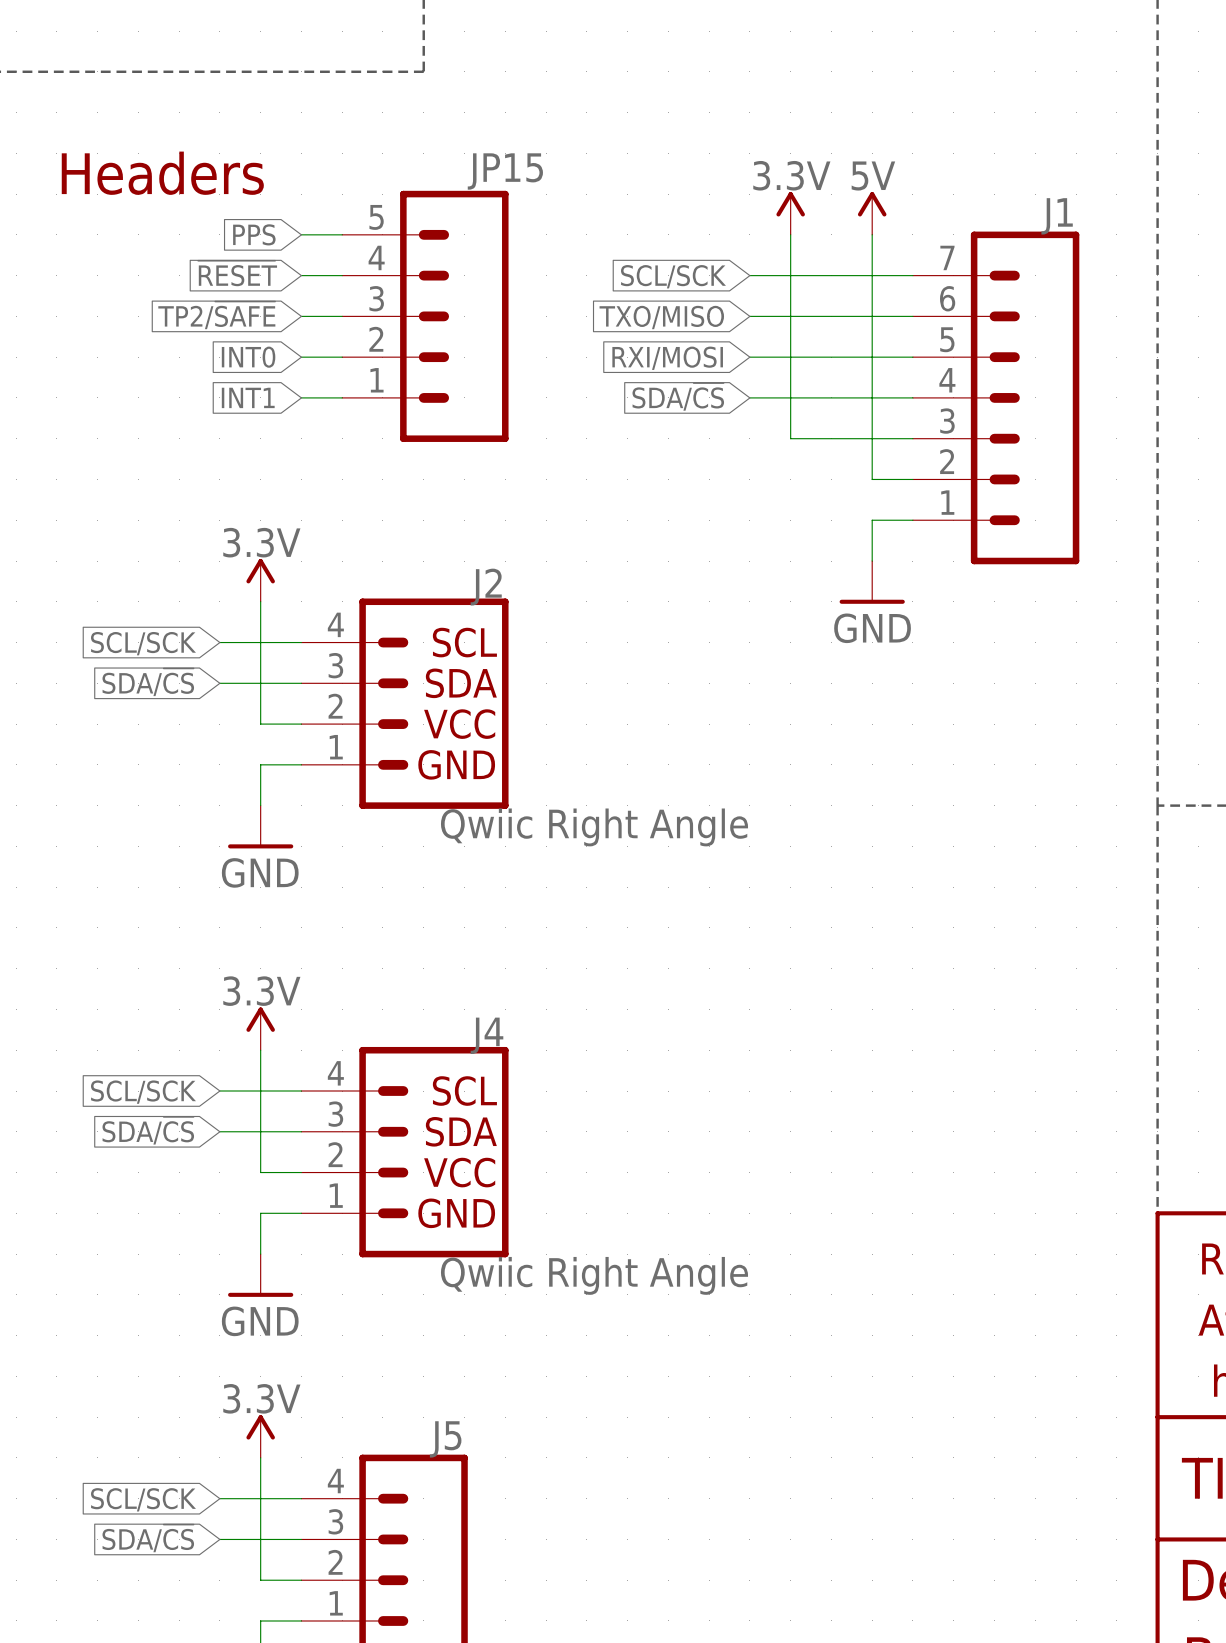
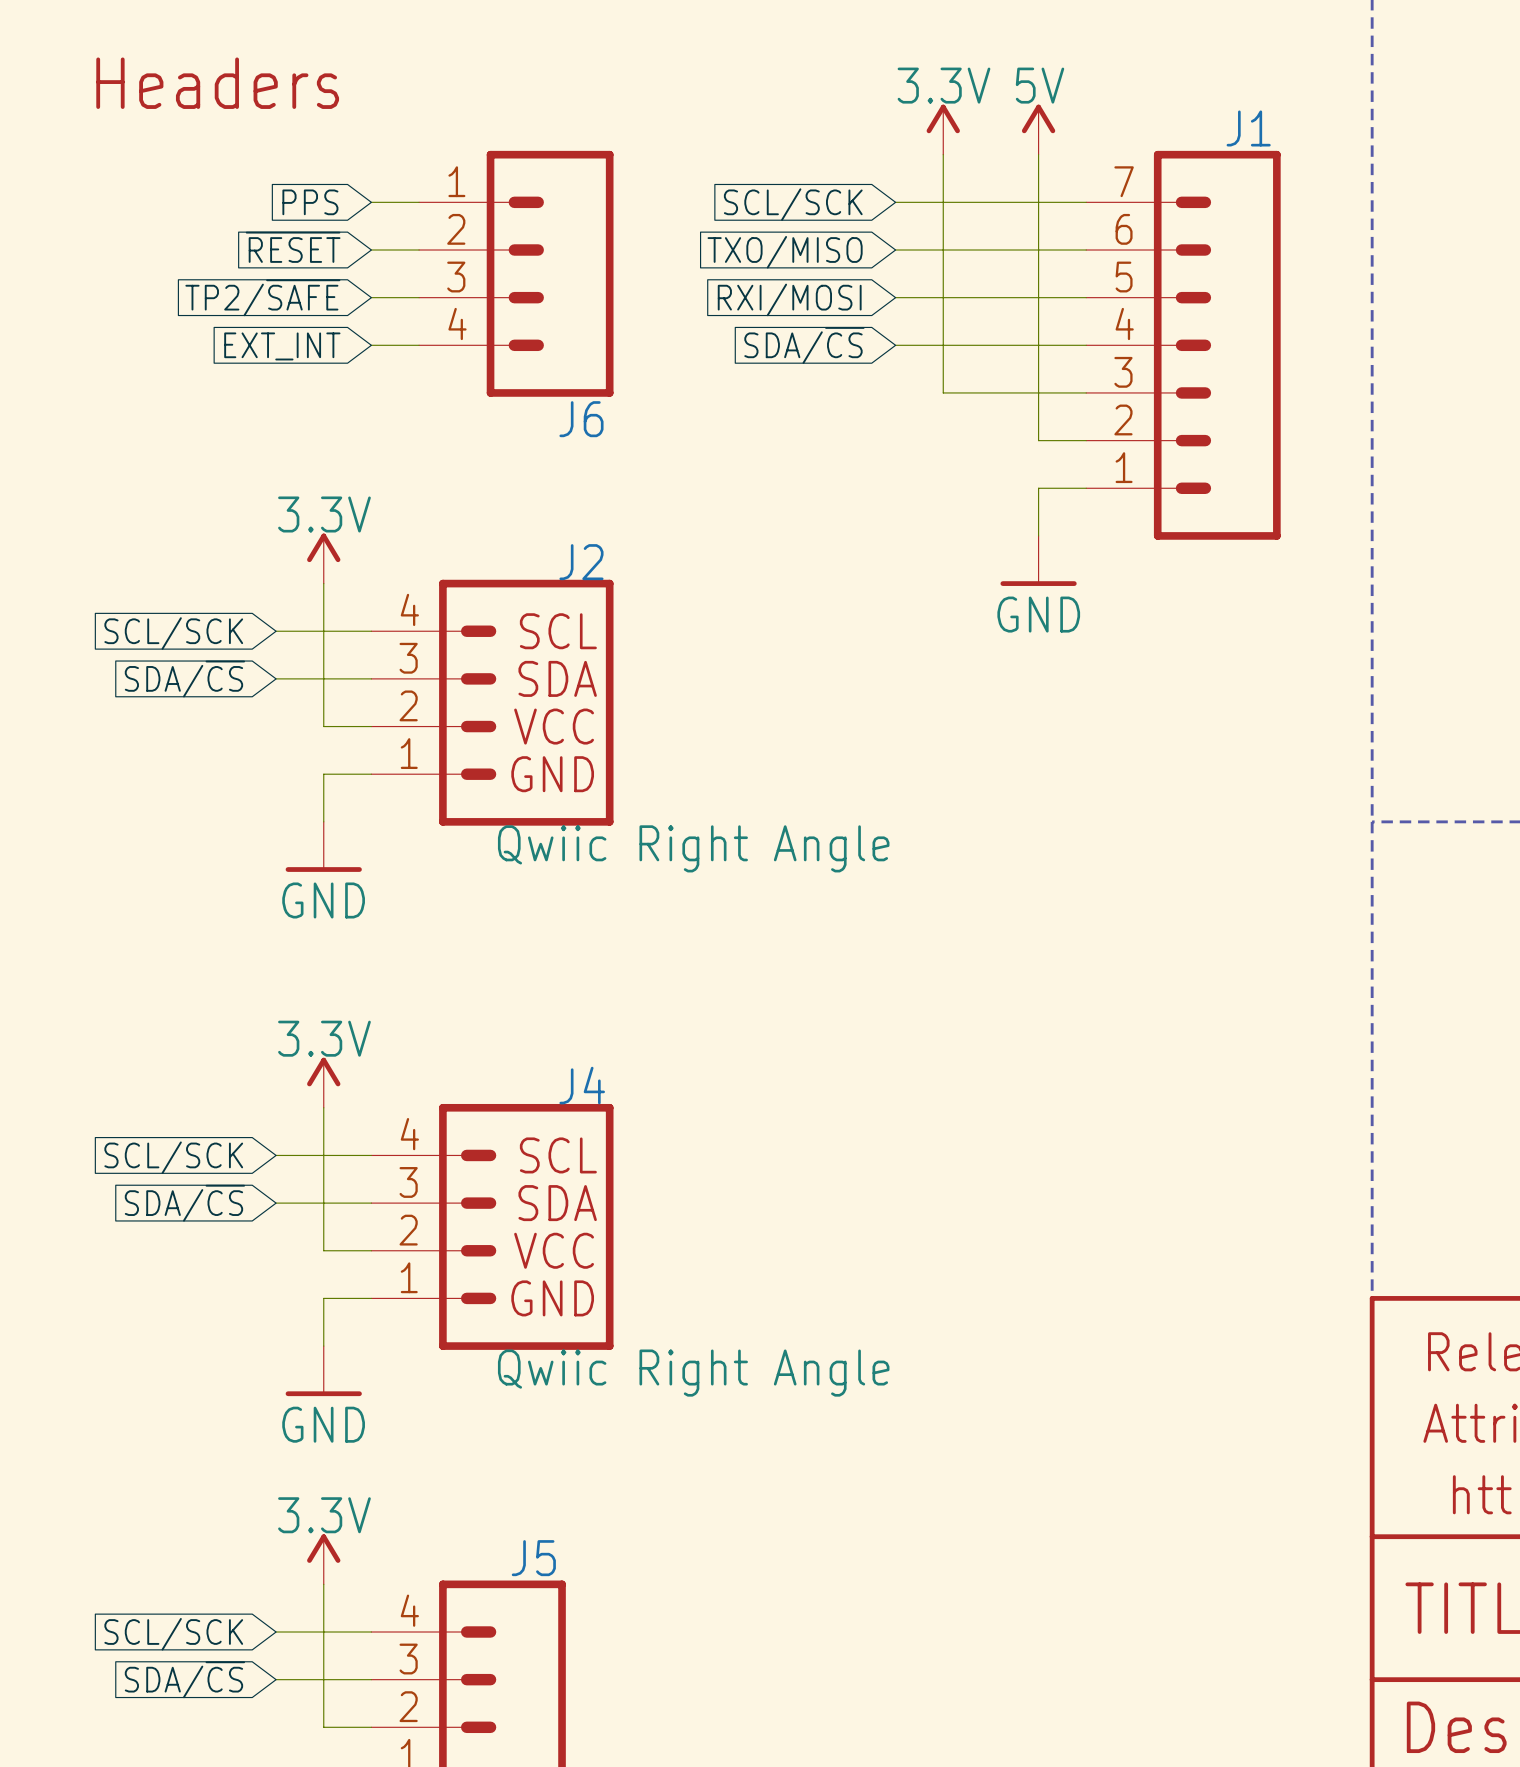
global label: PPS (254, 234) -> none
wire: (301, 234) (342, 234) -> none
global label: ~{RESET} (237, 273) -> PPS (310, 202)
global label: TP2/~{SAFE} (216, 315) -> ~{RESET} (293, 247)
JP15: (425, 316) -> none
J6: none -> (516, 273)
global label: INT0 (248, 357) -> TP2/~{SAFE} (262, 297)
global label: INT1 (248, 397) -> EXT_INT (282, 346)

